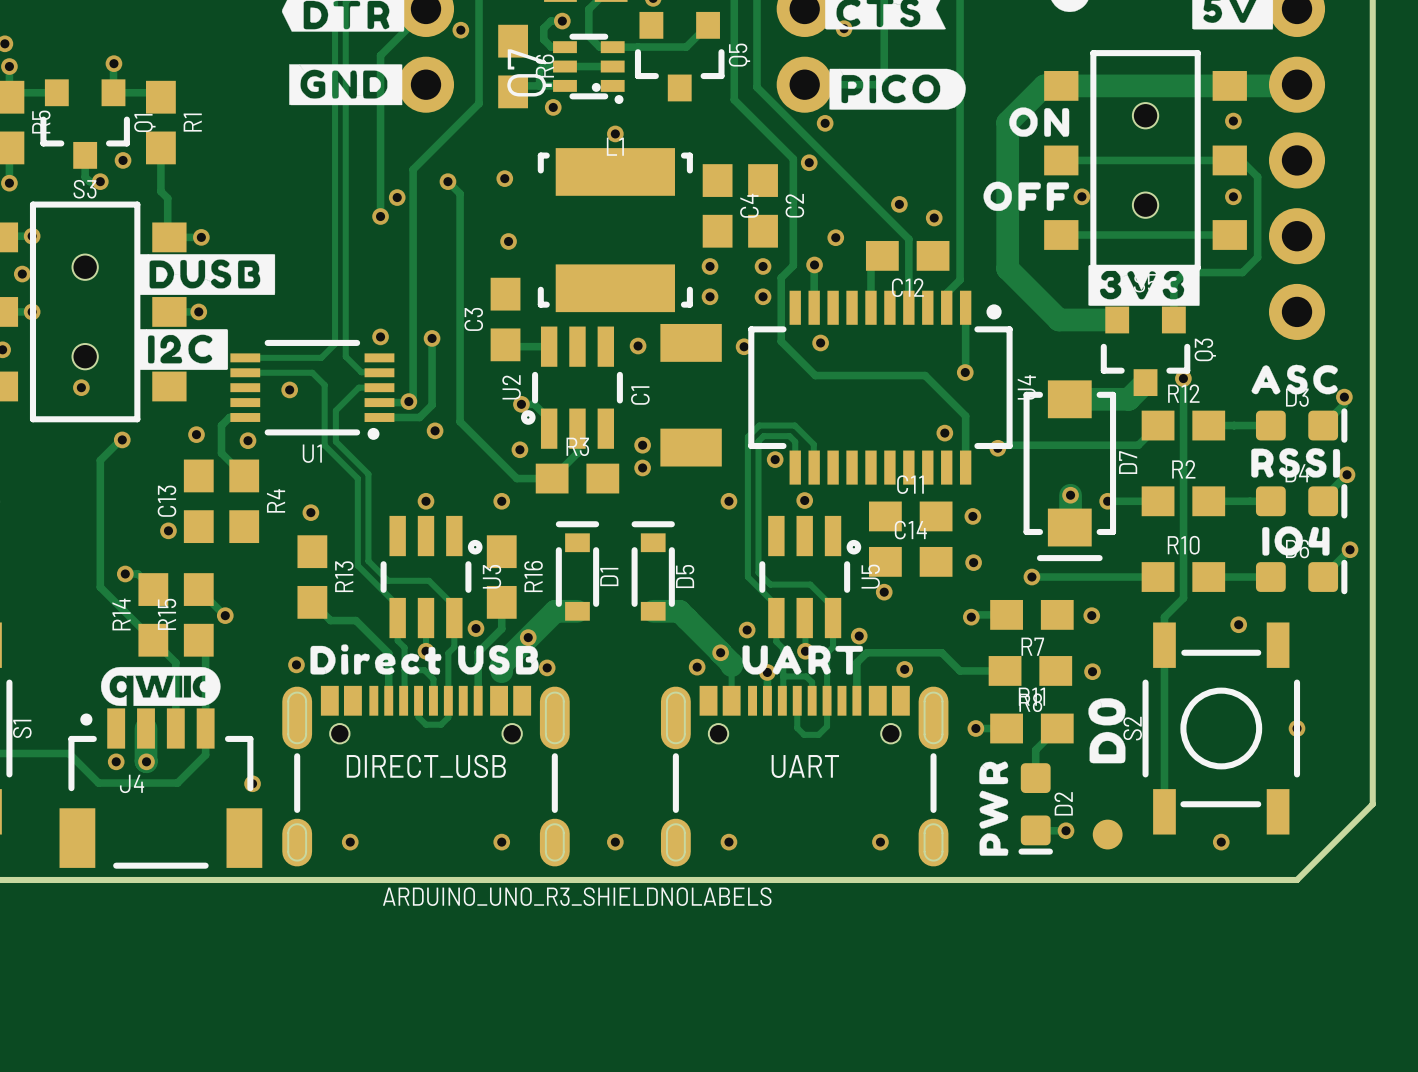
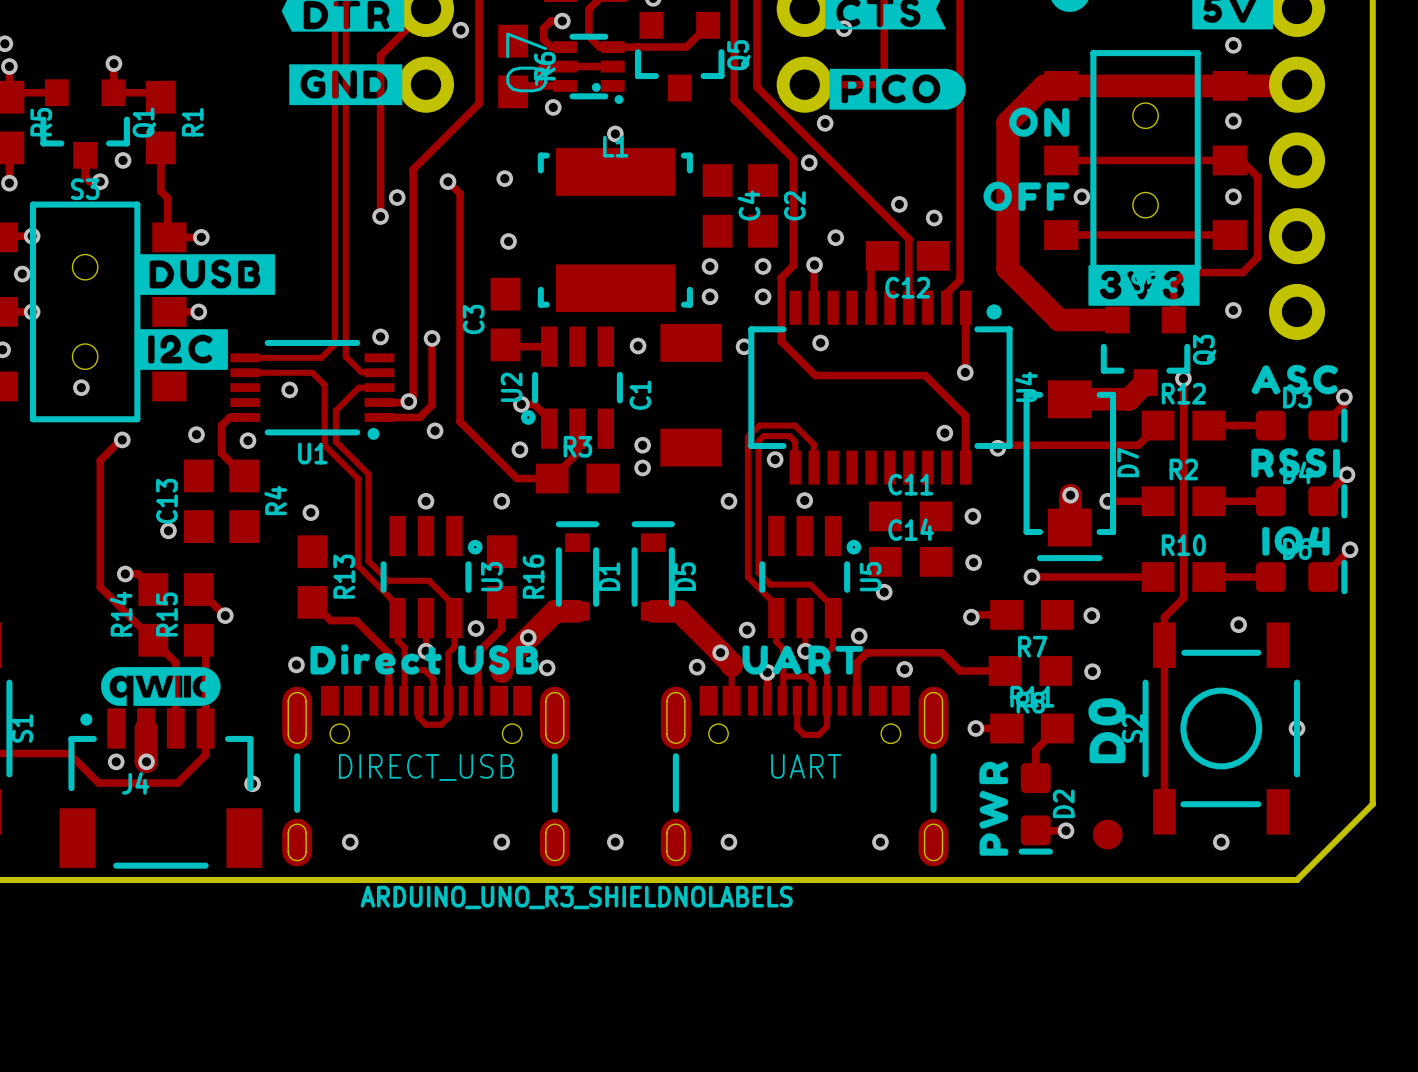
via: none -> (1233, 45)
via: none -> (1233, 310)

